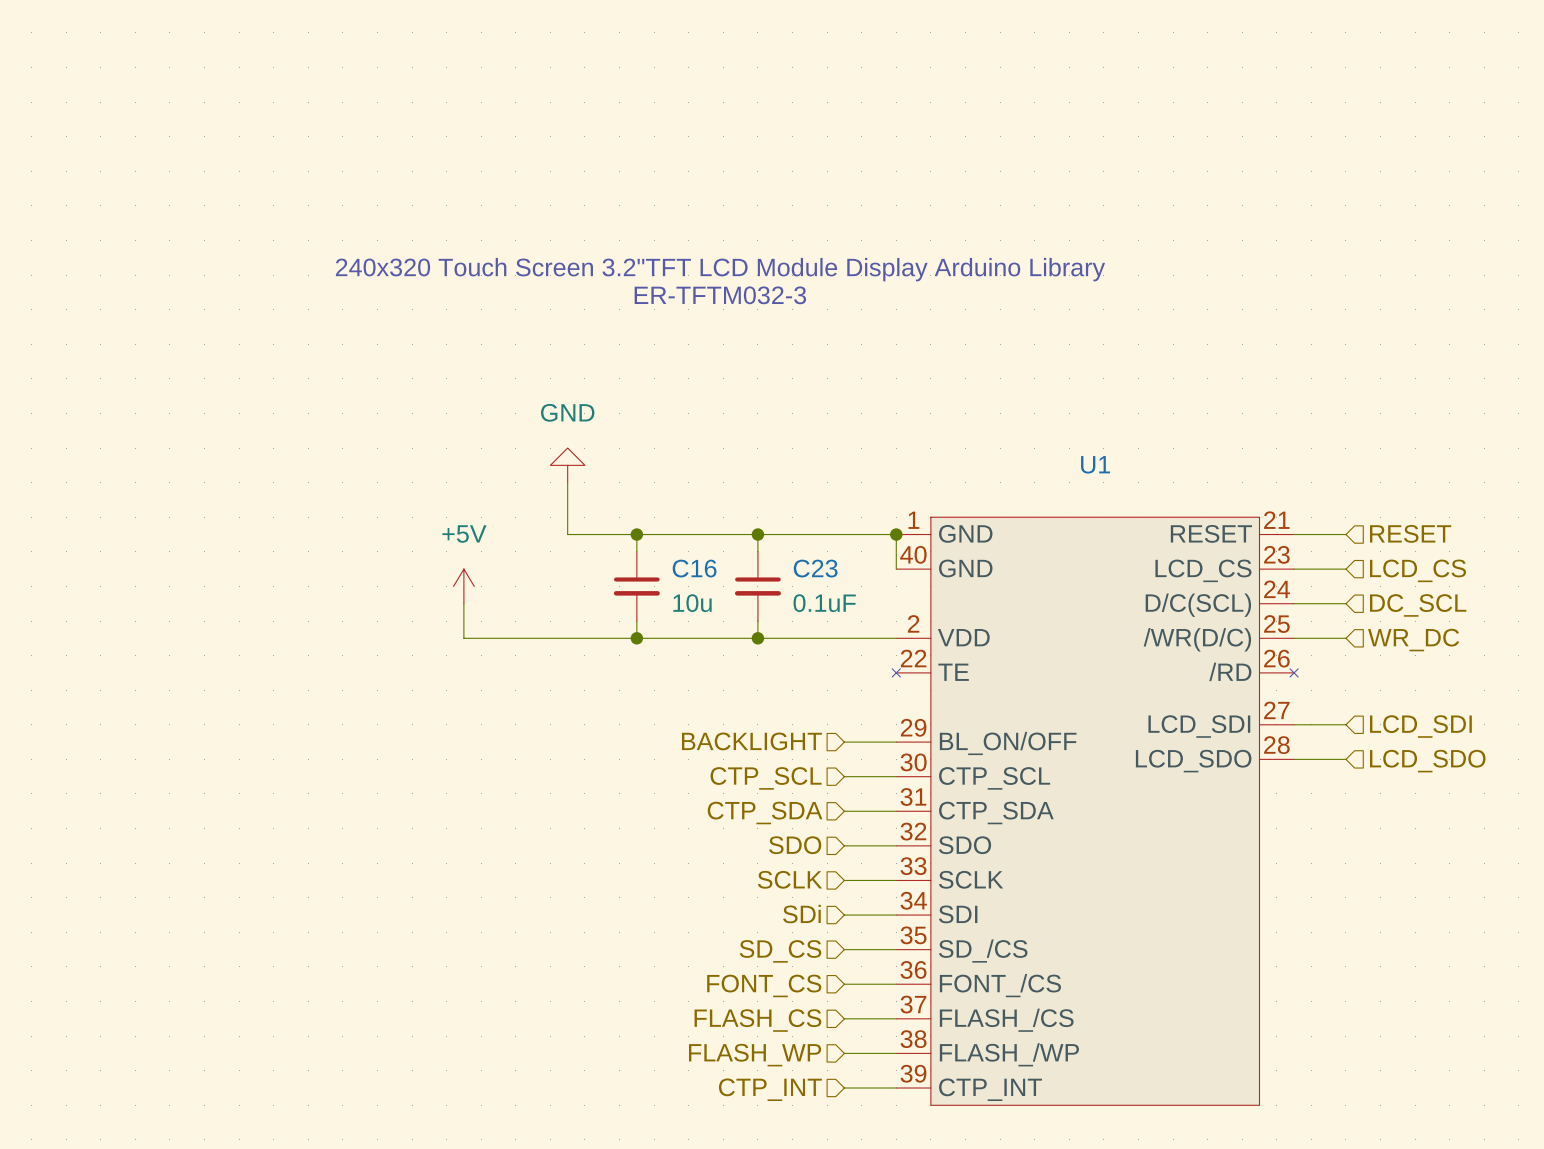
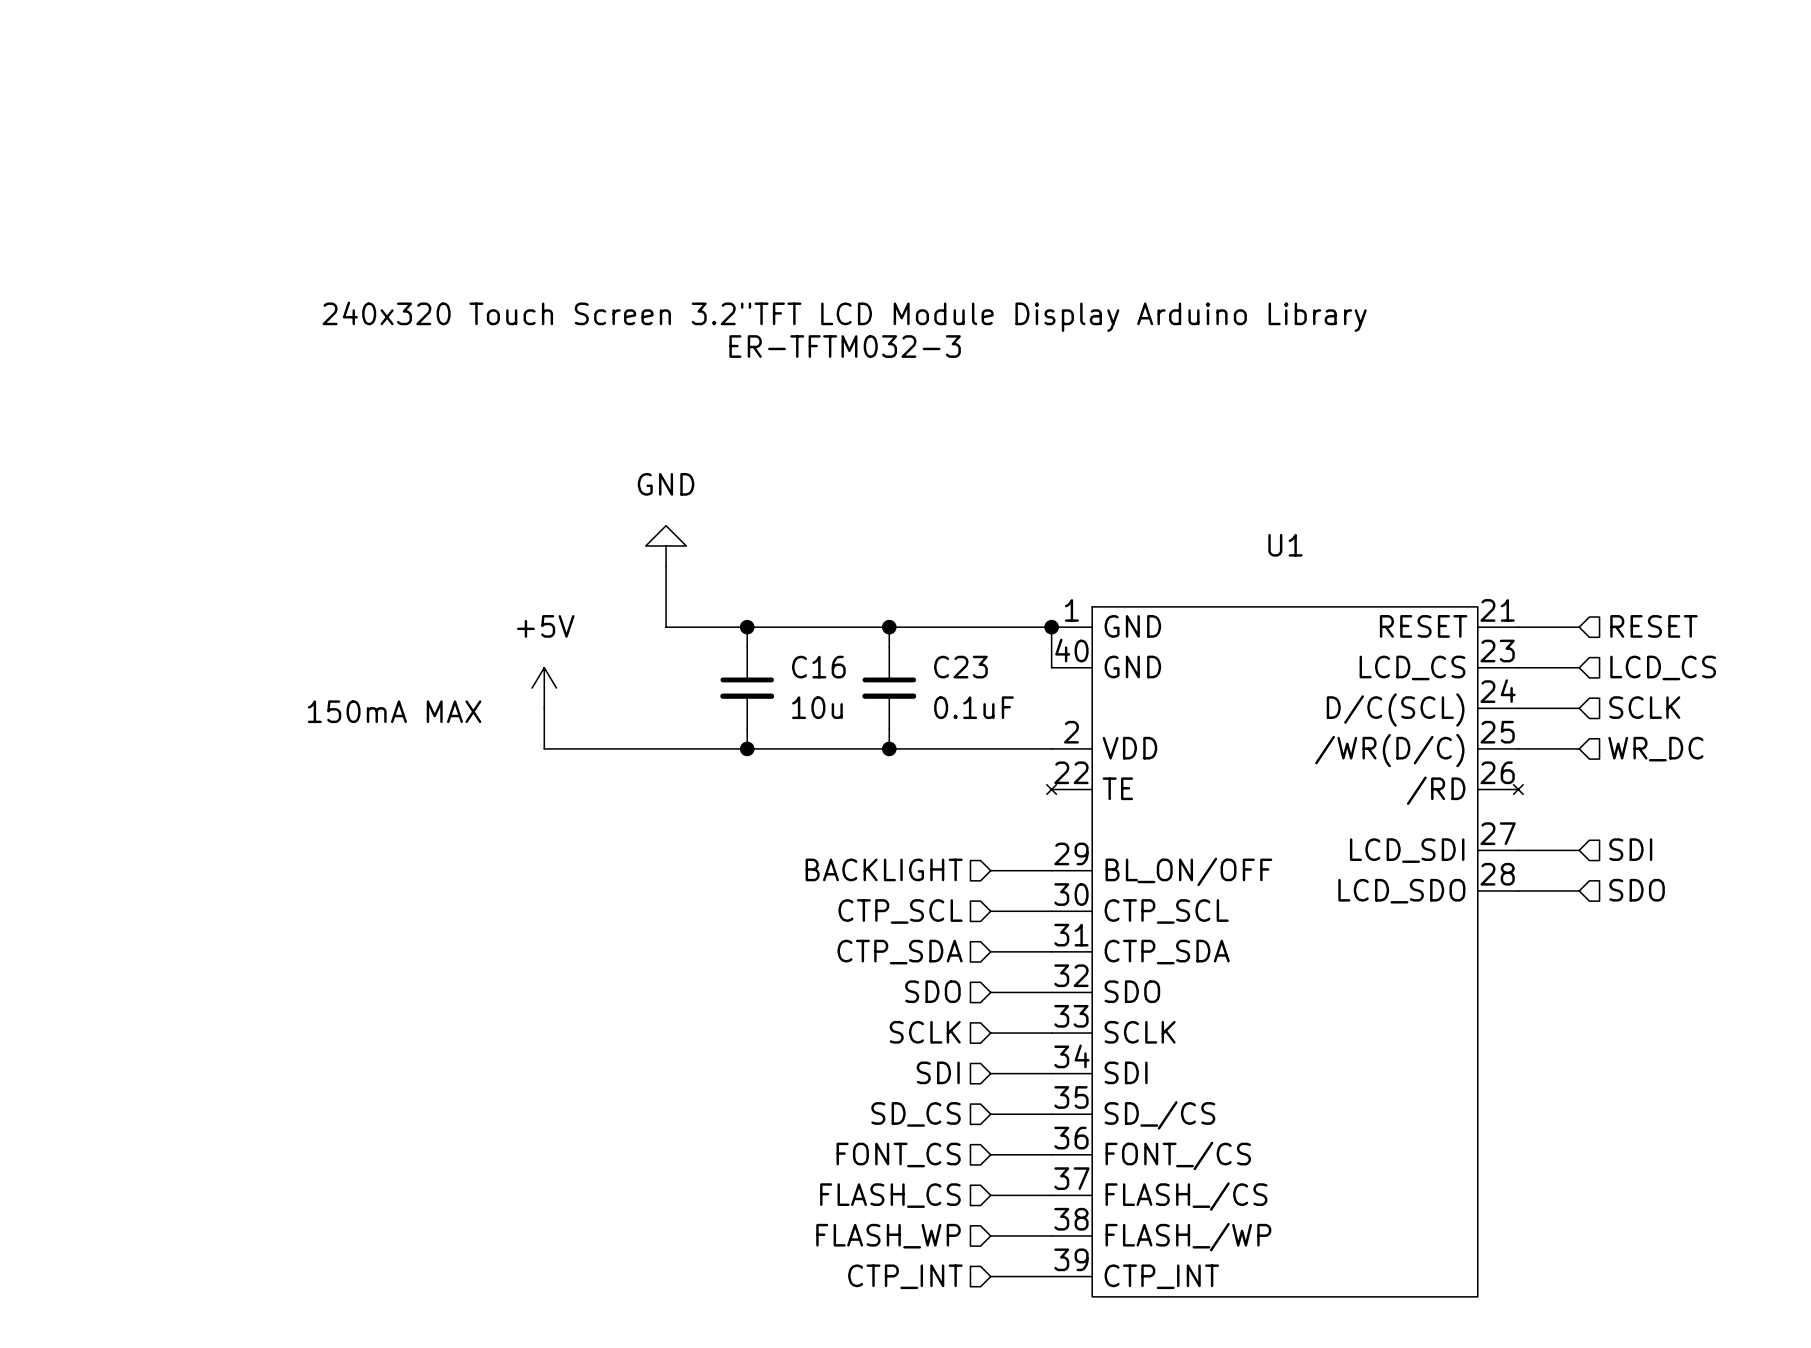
hierarchical label: DC_SCL (1418, 605) -> SCLK (1644, 707)
text: none -> 150mA MAX (394, 711)
hierarchical label: LCD_SDI (1420, 726) -> SDI (1630, 849)
hierarchical label: LCD_SDO (1427, 761) -> SDO (1637, 890)
hierarchical label: SDi (801, 914) -> SDI (938, 1072)

